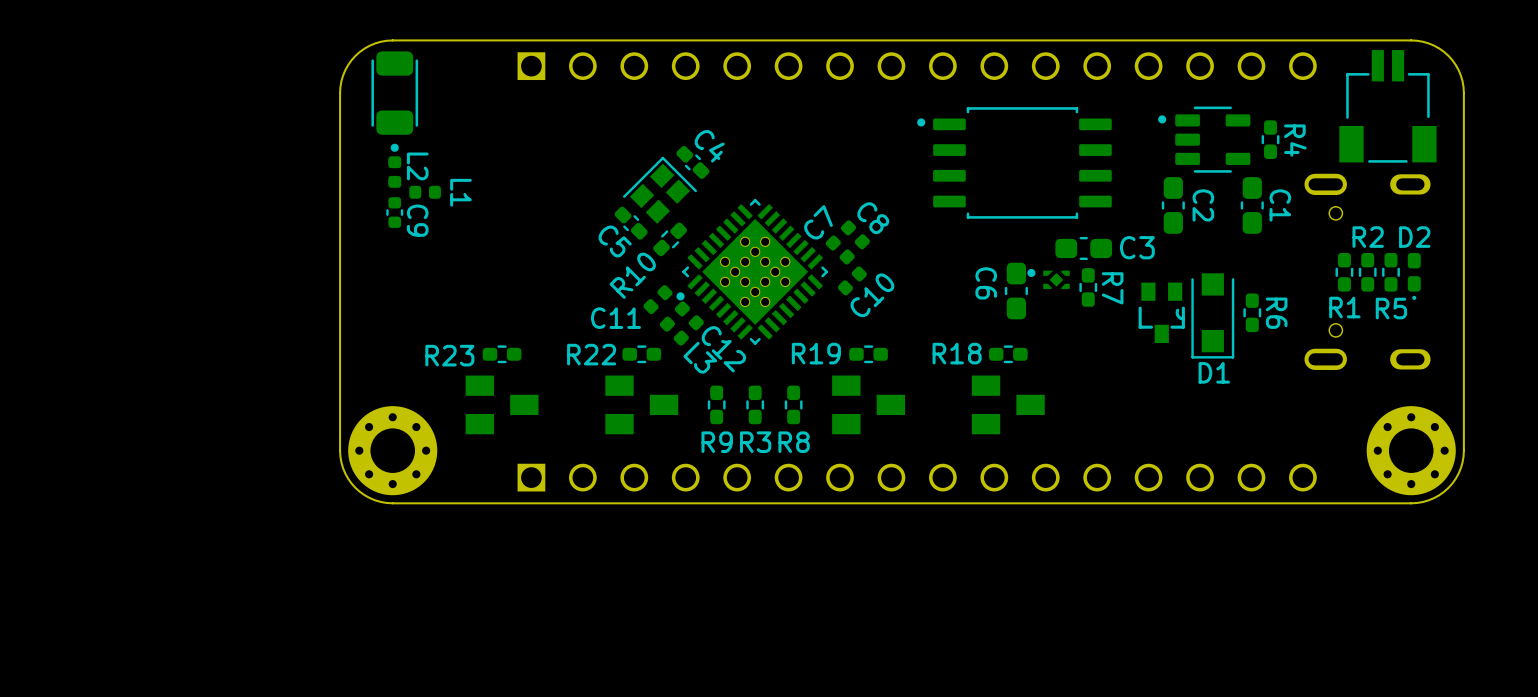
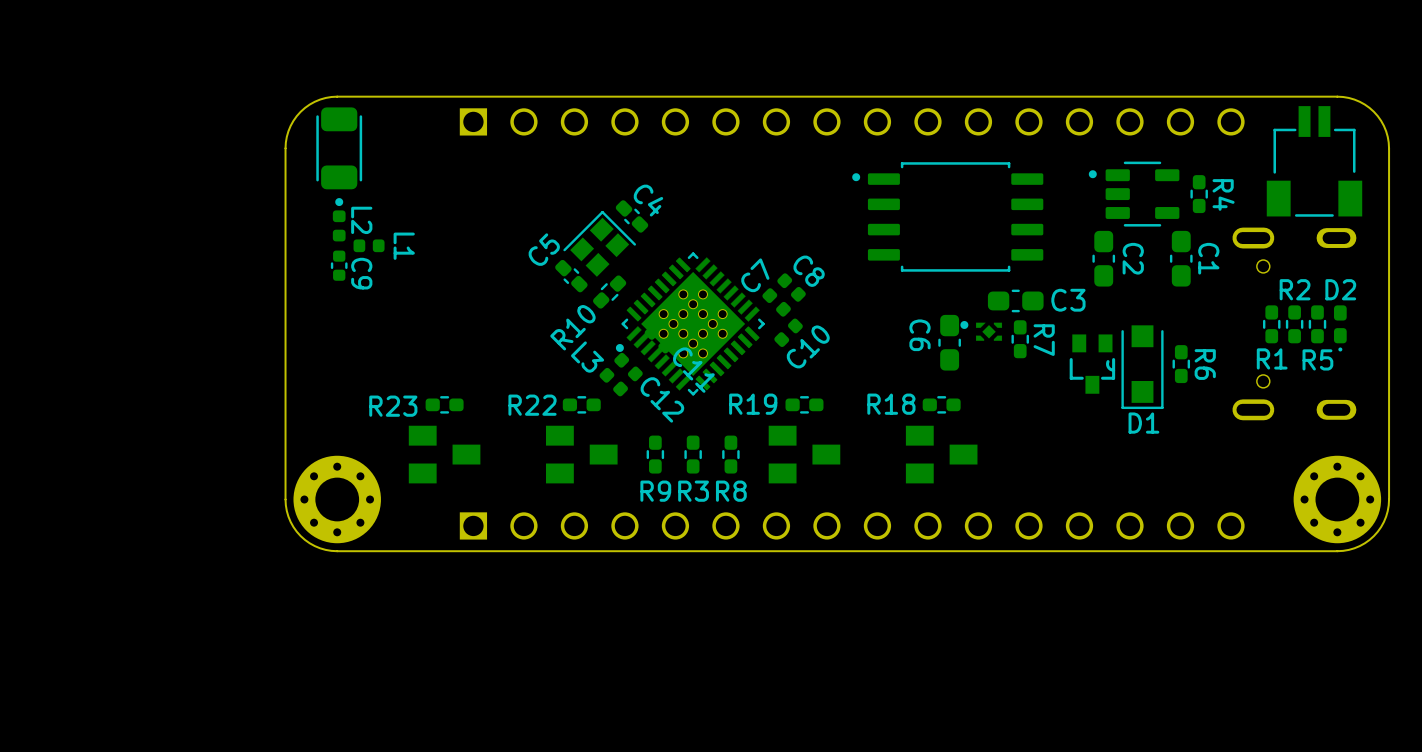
C5 name rotation: 0° (615, 241) -> 90° counterclockwise (544, 249)
C11 rotation: 0° (657, 299) -> 90° clockwise (658, 339)
C11 position: (657, 299) -> (658, 339)
C11 name position: C11 (615, 318) -> C11 (693, 370)
L3 name position: L3 (700, 357) -> L3 (587, 357)

